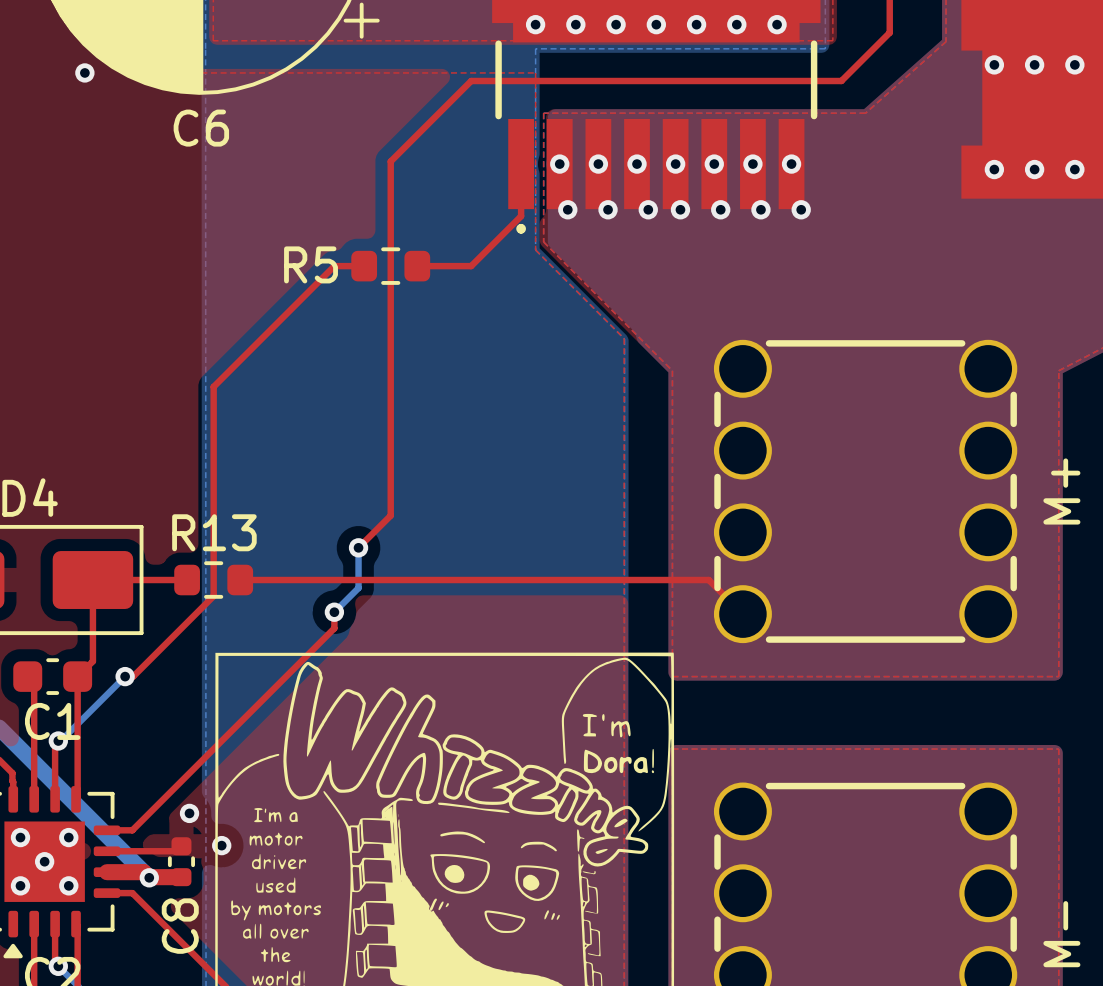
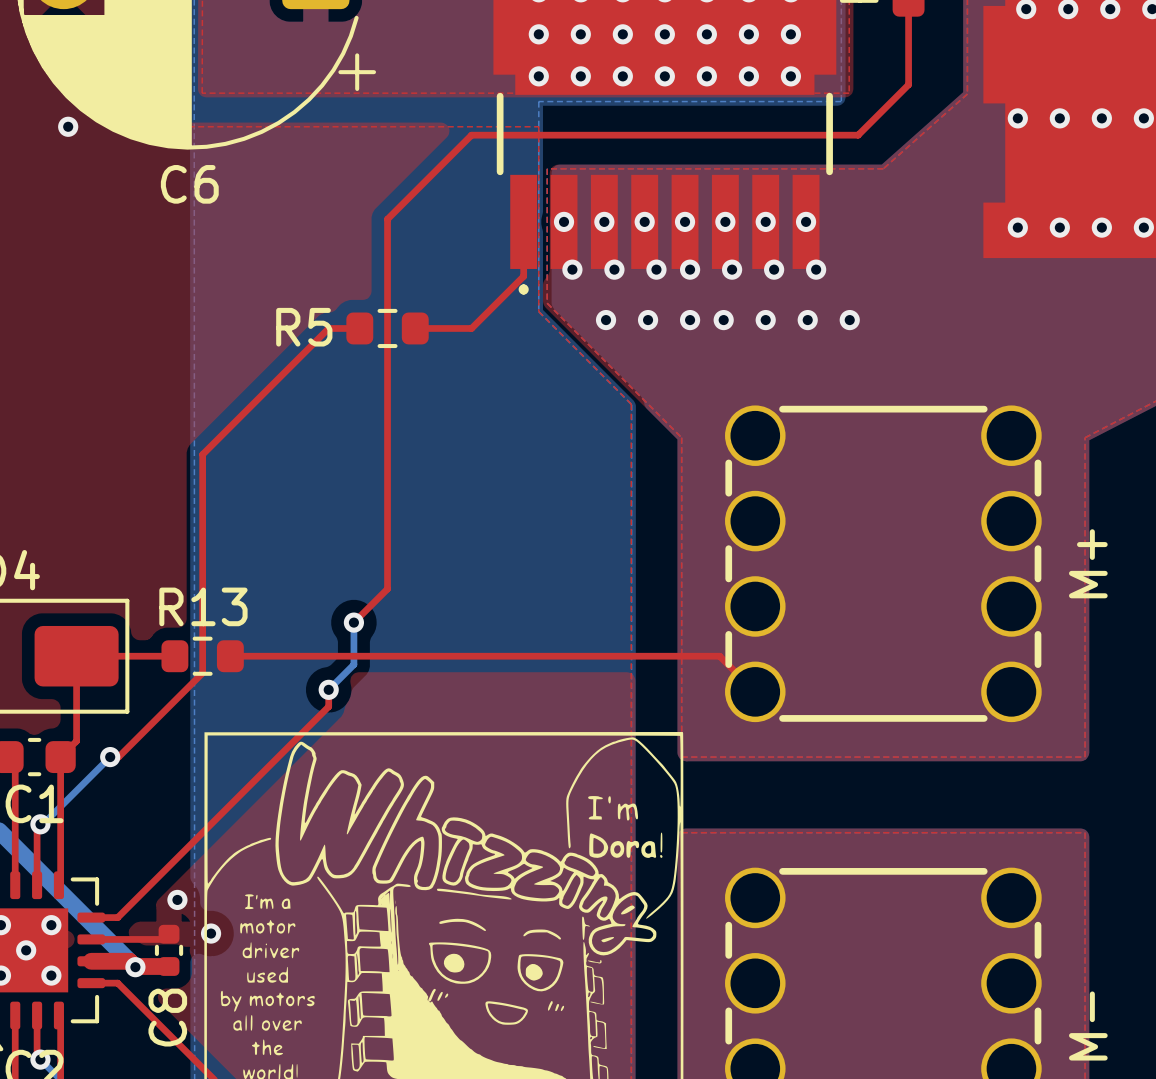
via: none -> (606, 320)
via: none -> (648, 320)
via: none -> (690, 320)
via: none -> (723, 320)
via: none -> (765, 320)
via: none -> (807, 320)
via: none -> (849, 320)

